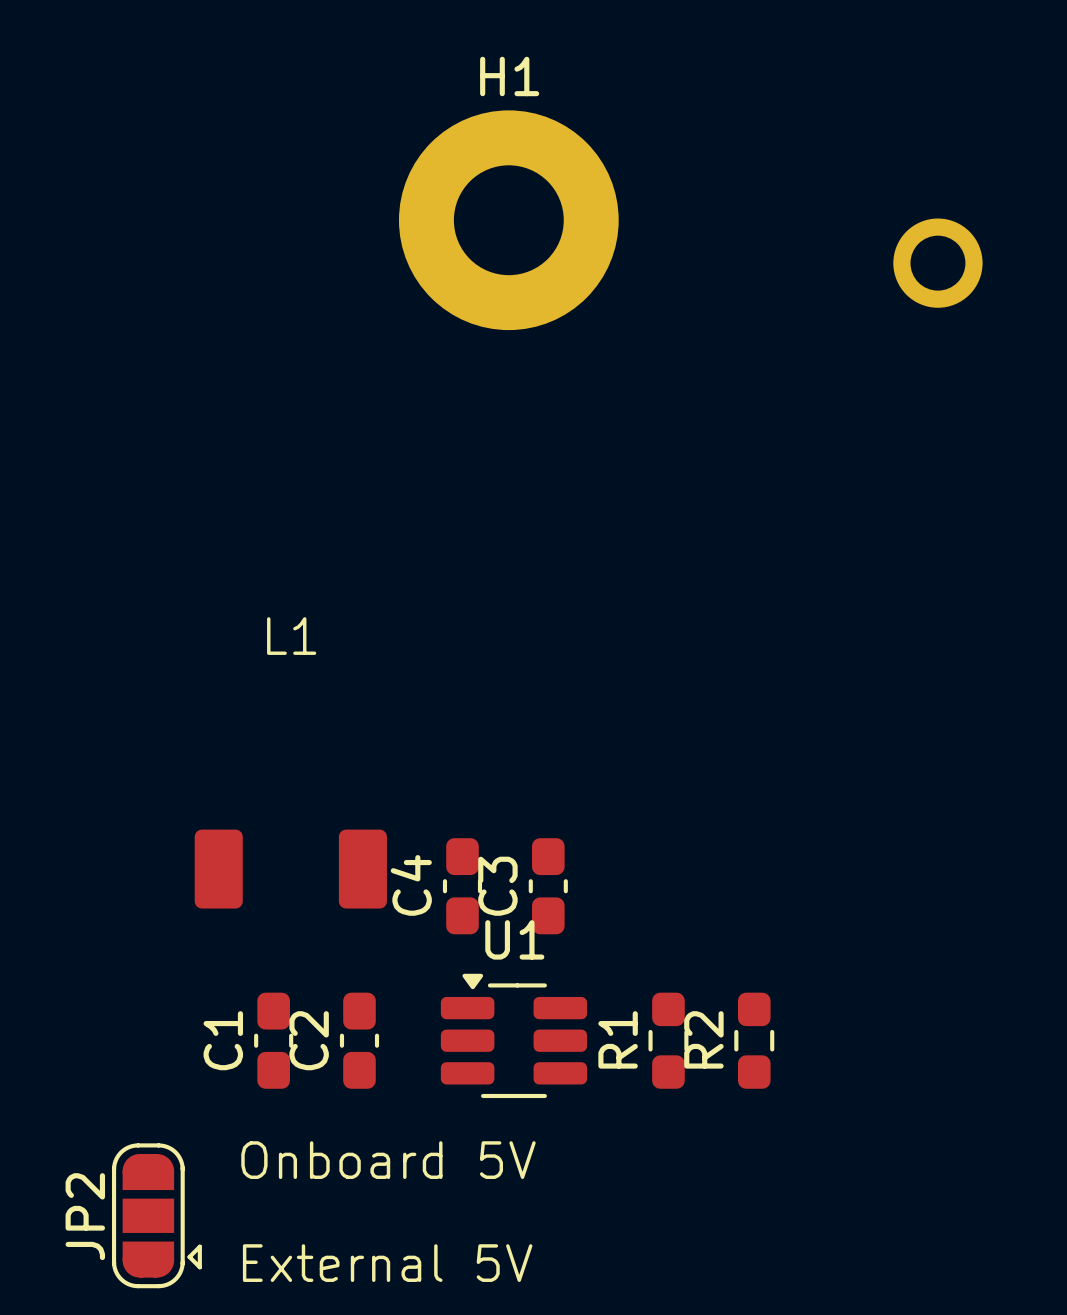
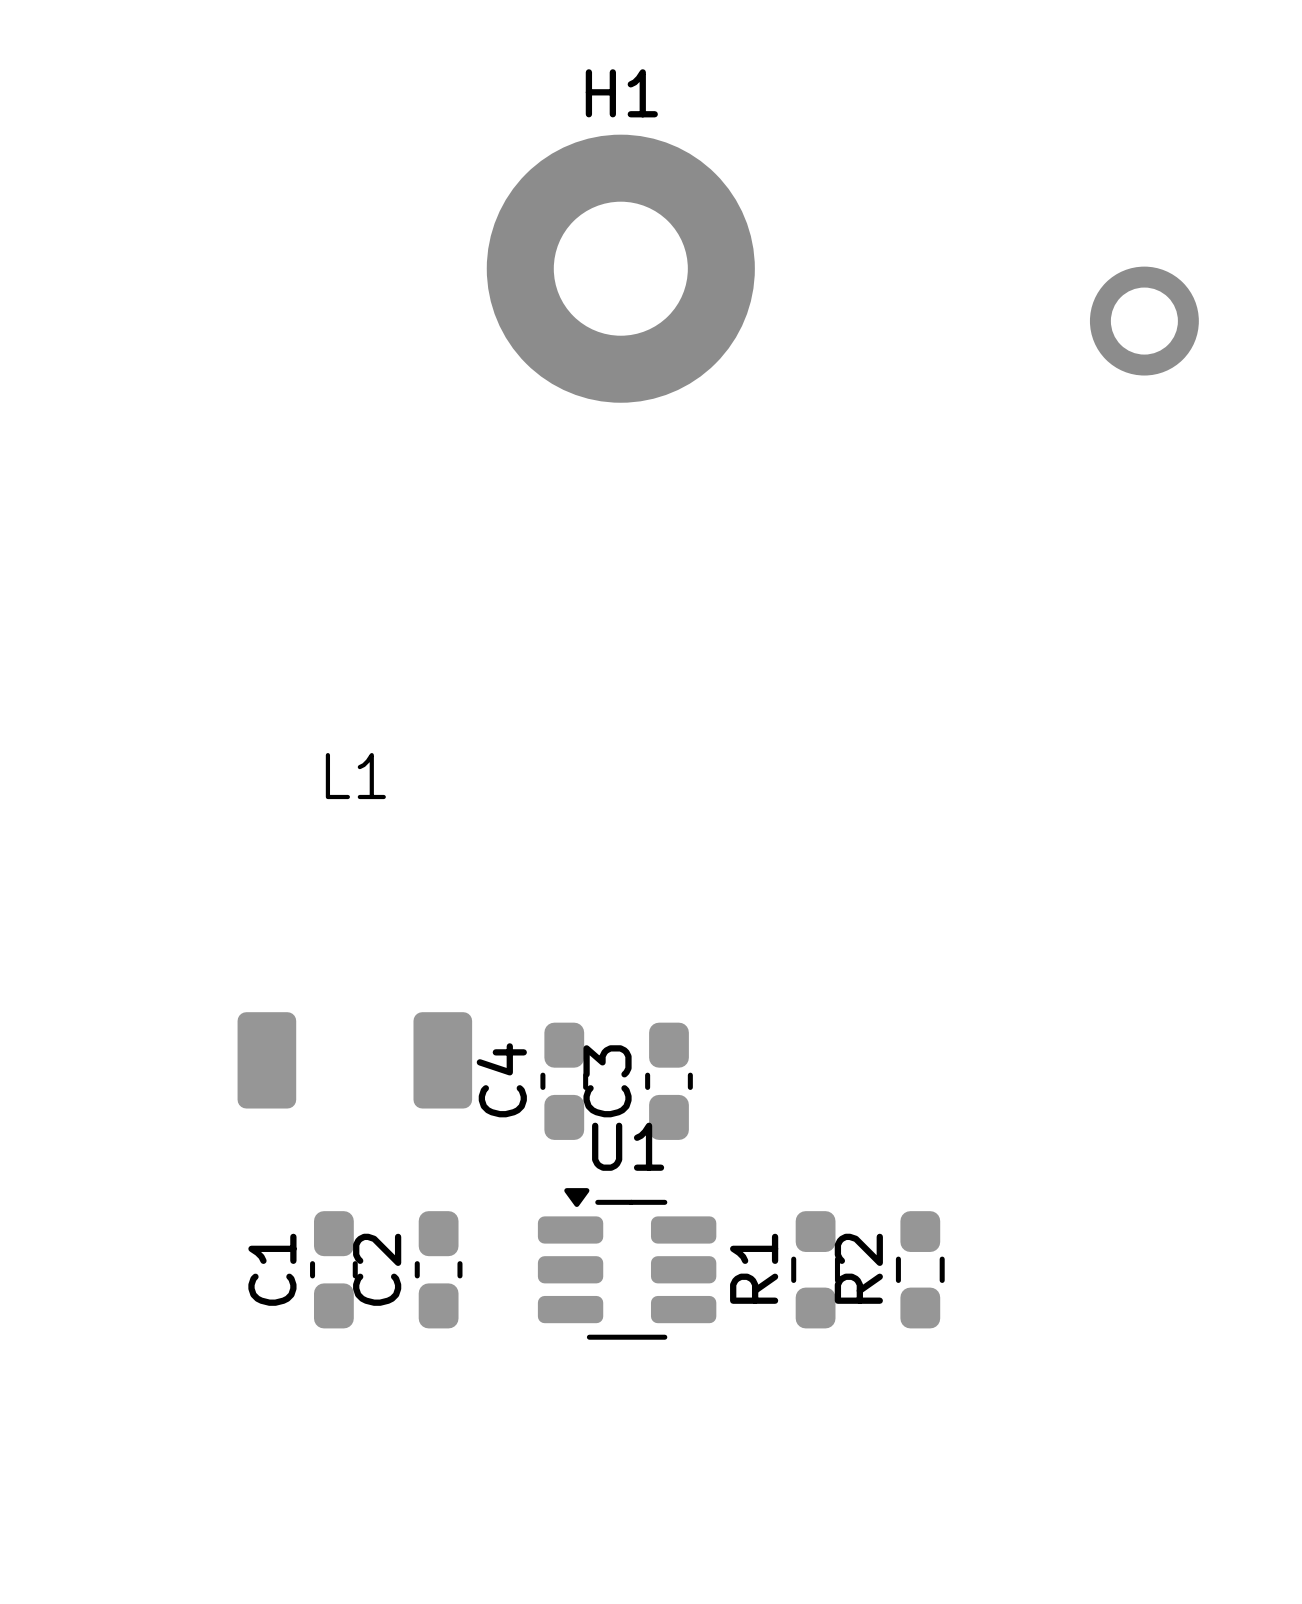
text: Onboard 5V (388, 1160) -> none
JP2: (156, 1215) -> none
text: External 5V (387, 1263) -> none

